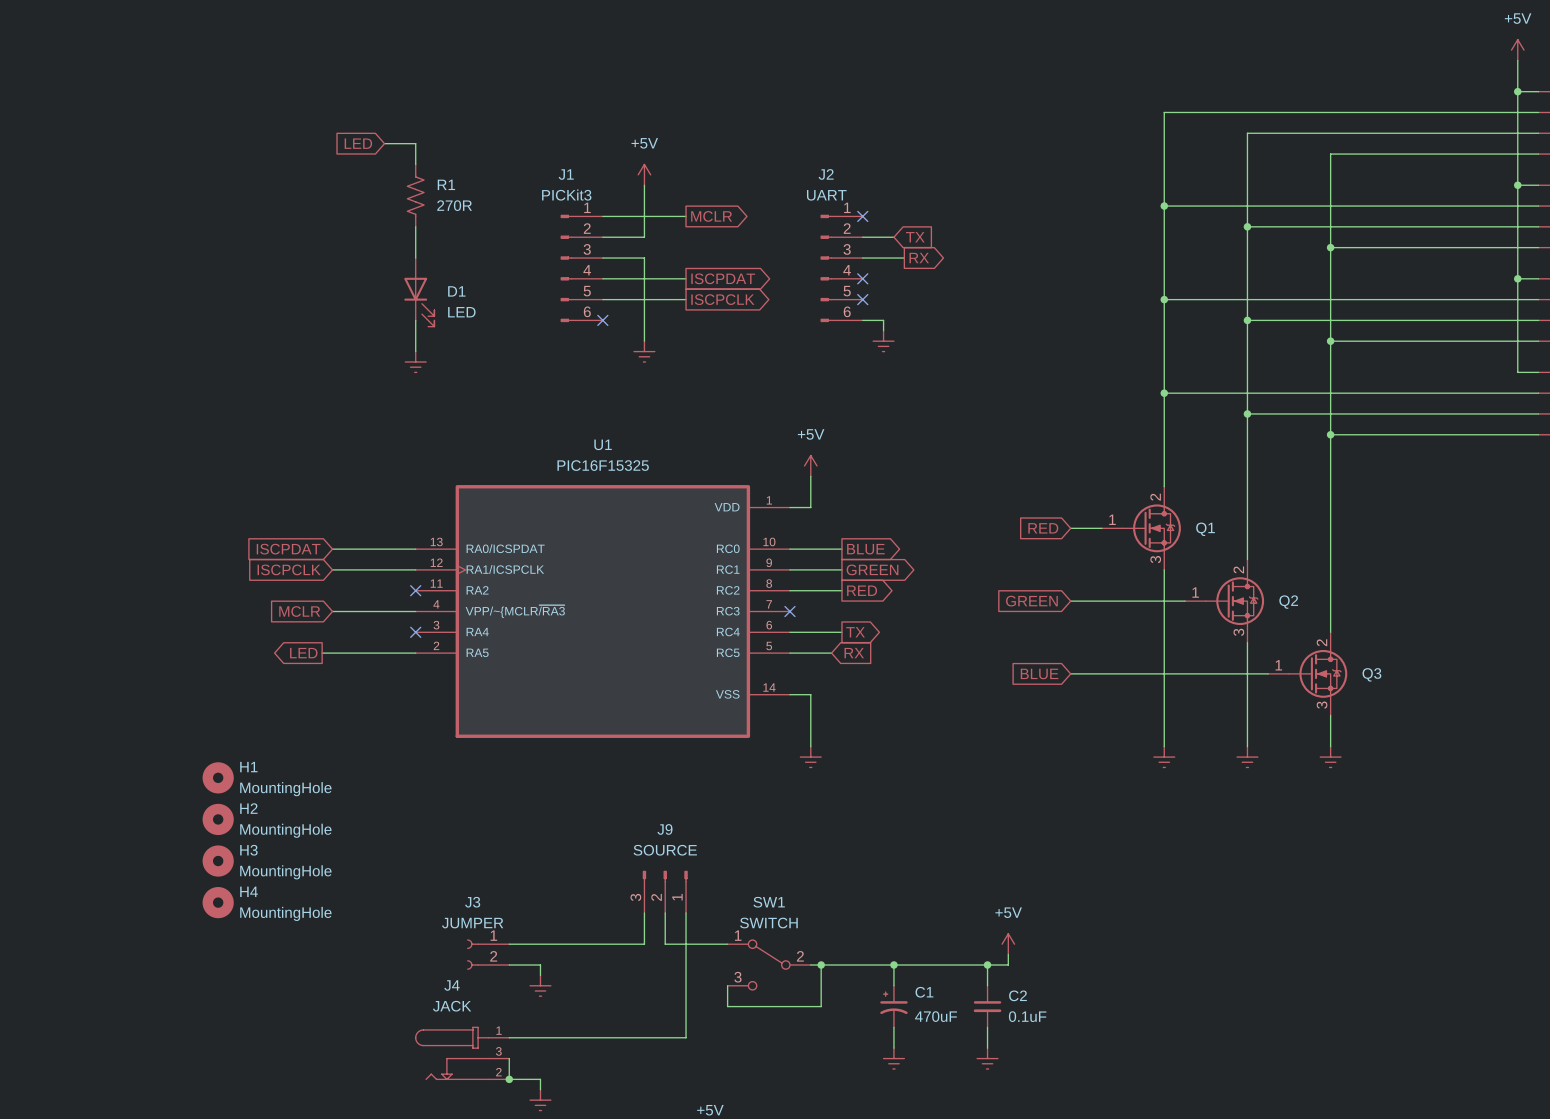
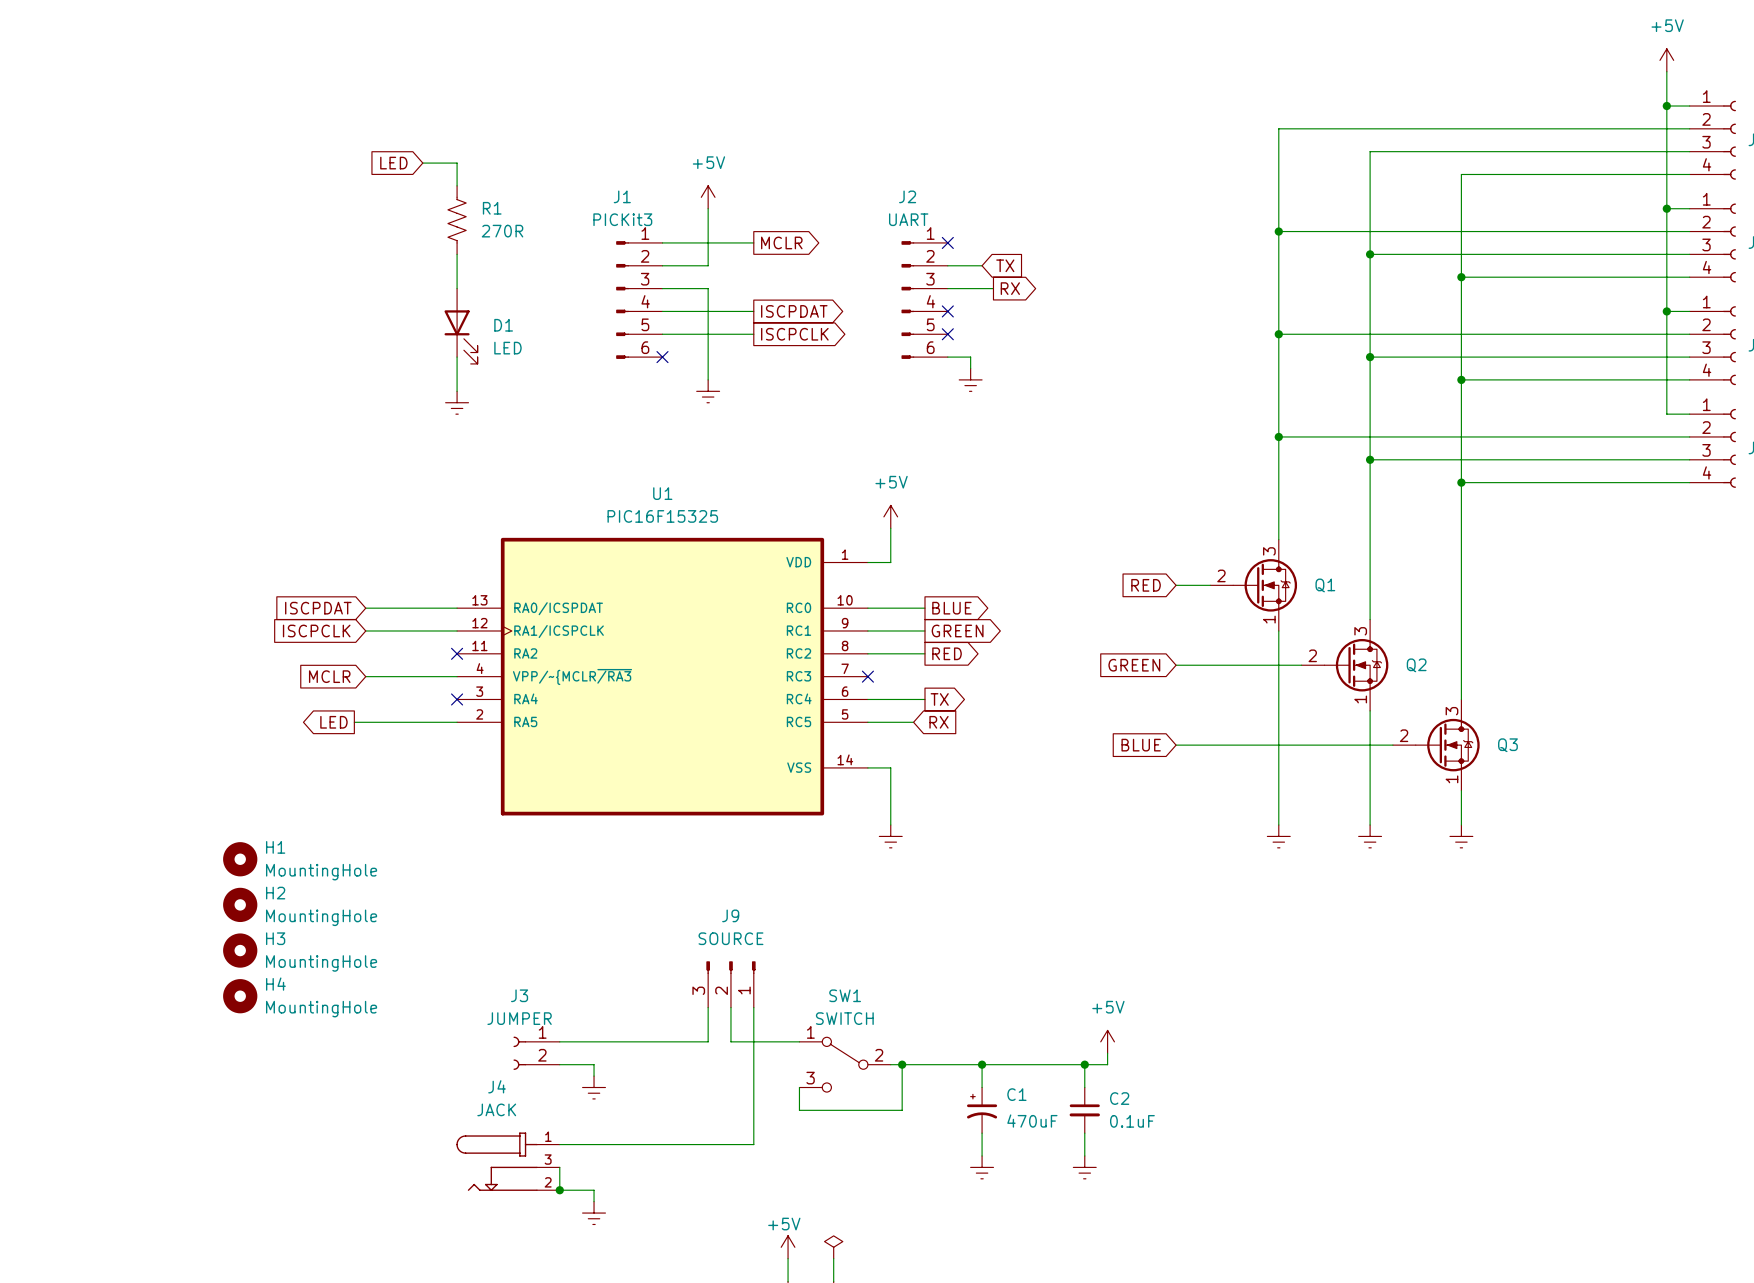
Q1 pin number: 2 (1155, 497) -> 3 (1269, 551)
Q1 pin number: 1 (1112, 519) -> 2 (1221, 575)
Q1 pin number: 3 (1155, 559) -> 1 (1269, 619)
Q2 pin number: 2 (1238, 569) -> 3 (1360, 631)
Q2 pin number: 1 (1195, 592) -> 2 (1312, 655)
Q2 pin number: 3 (1238, 632) -> 1 (1360, 699)
Q3 pin number: 2 (1321, 642) -> 3 (1451, 711)
Q3 pin number: 1 (1278, 665) -> 2 (1404, 735)
Q3 pin number: 3 (1322, 705) -> 1 (1451, 779)

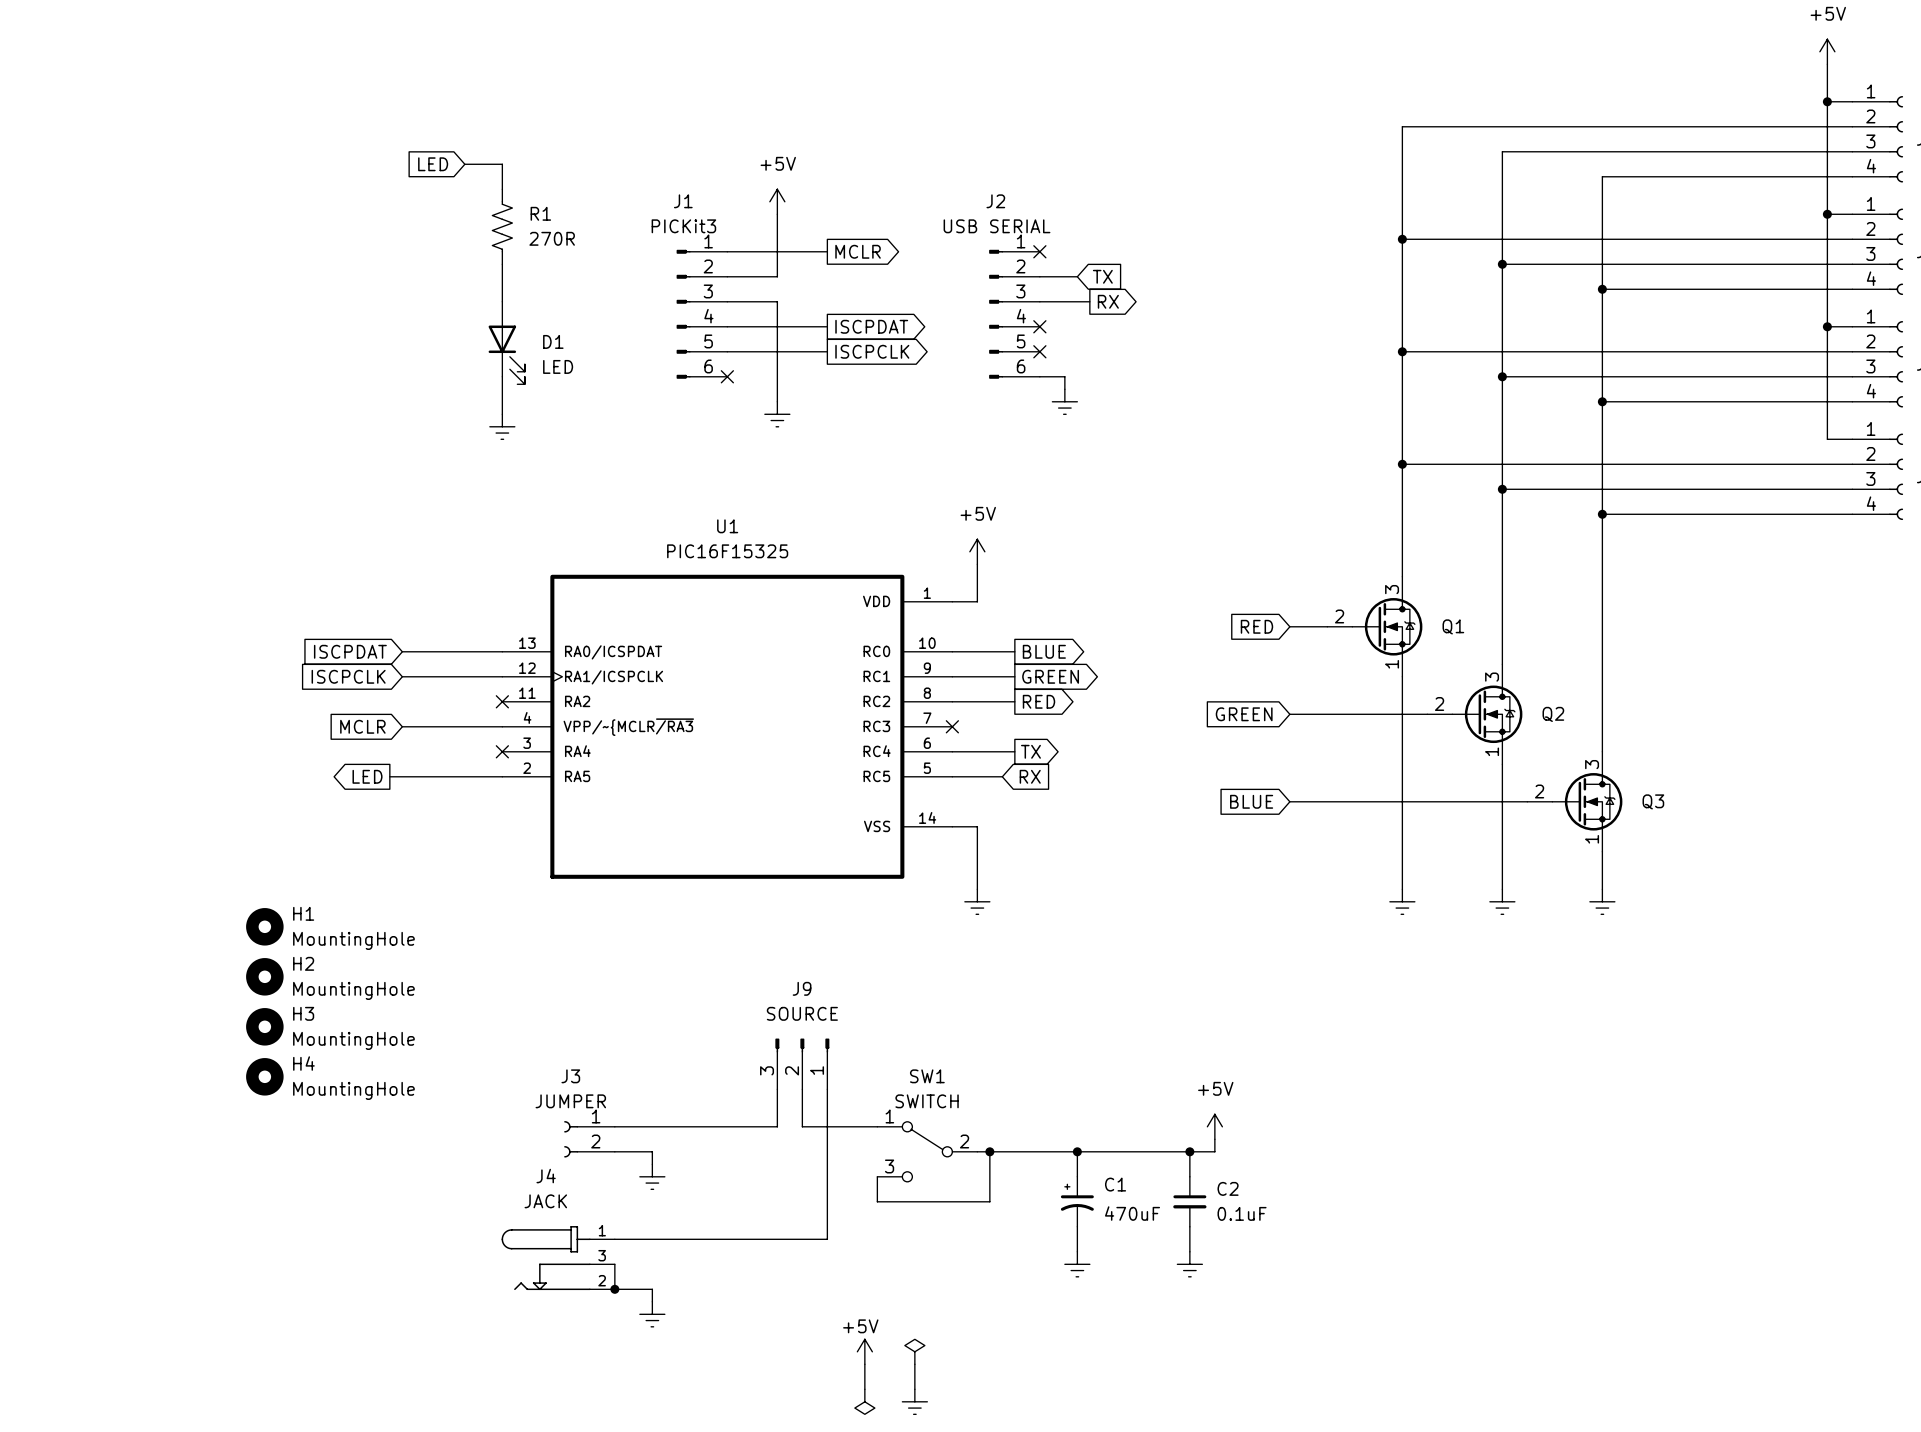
J2 value: UART (908, 219) -> USB SERIAL (997, 226)

